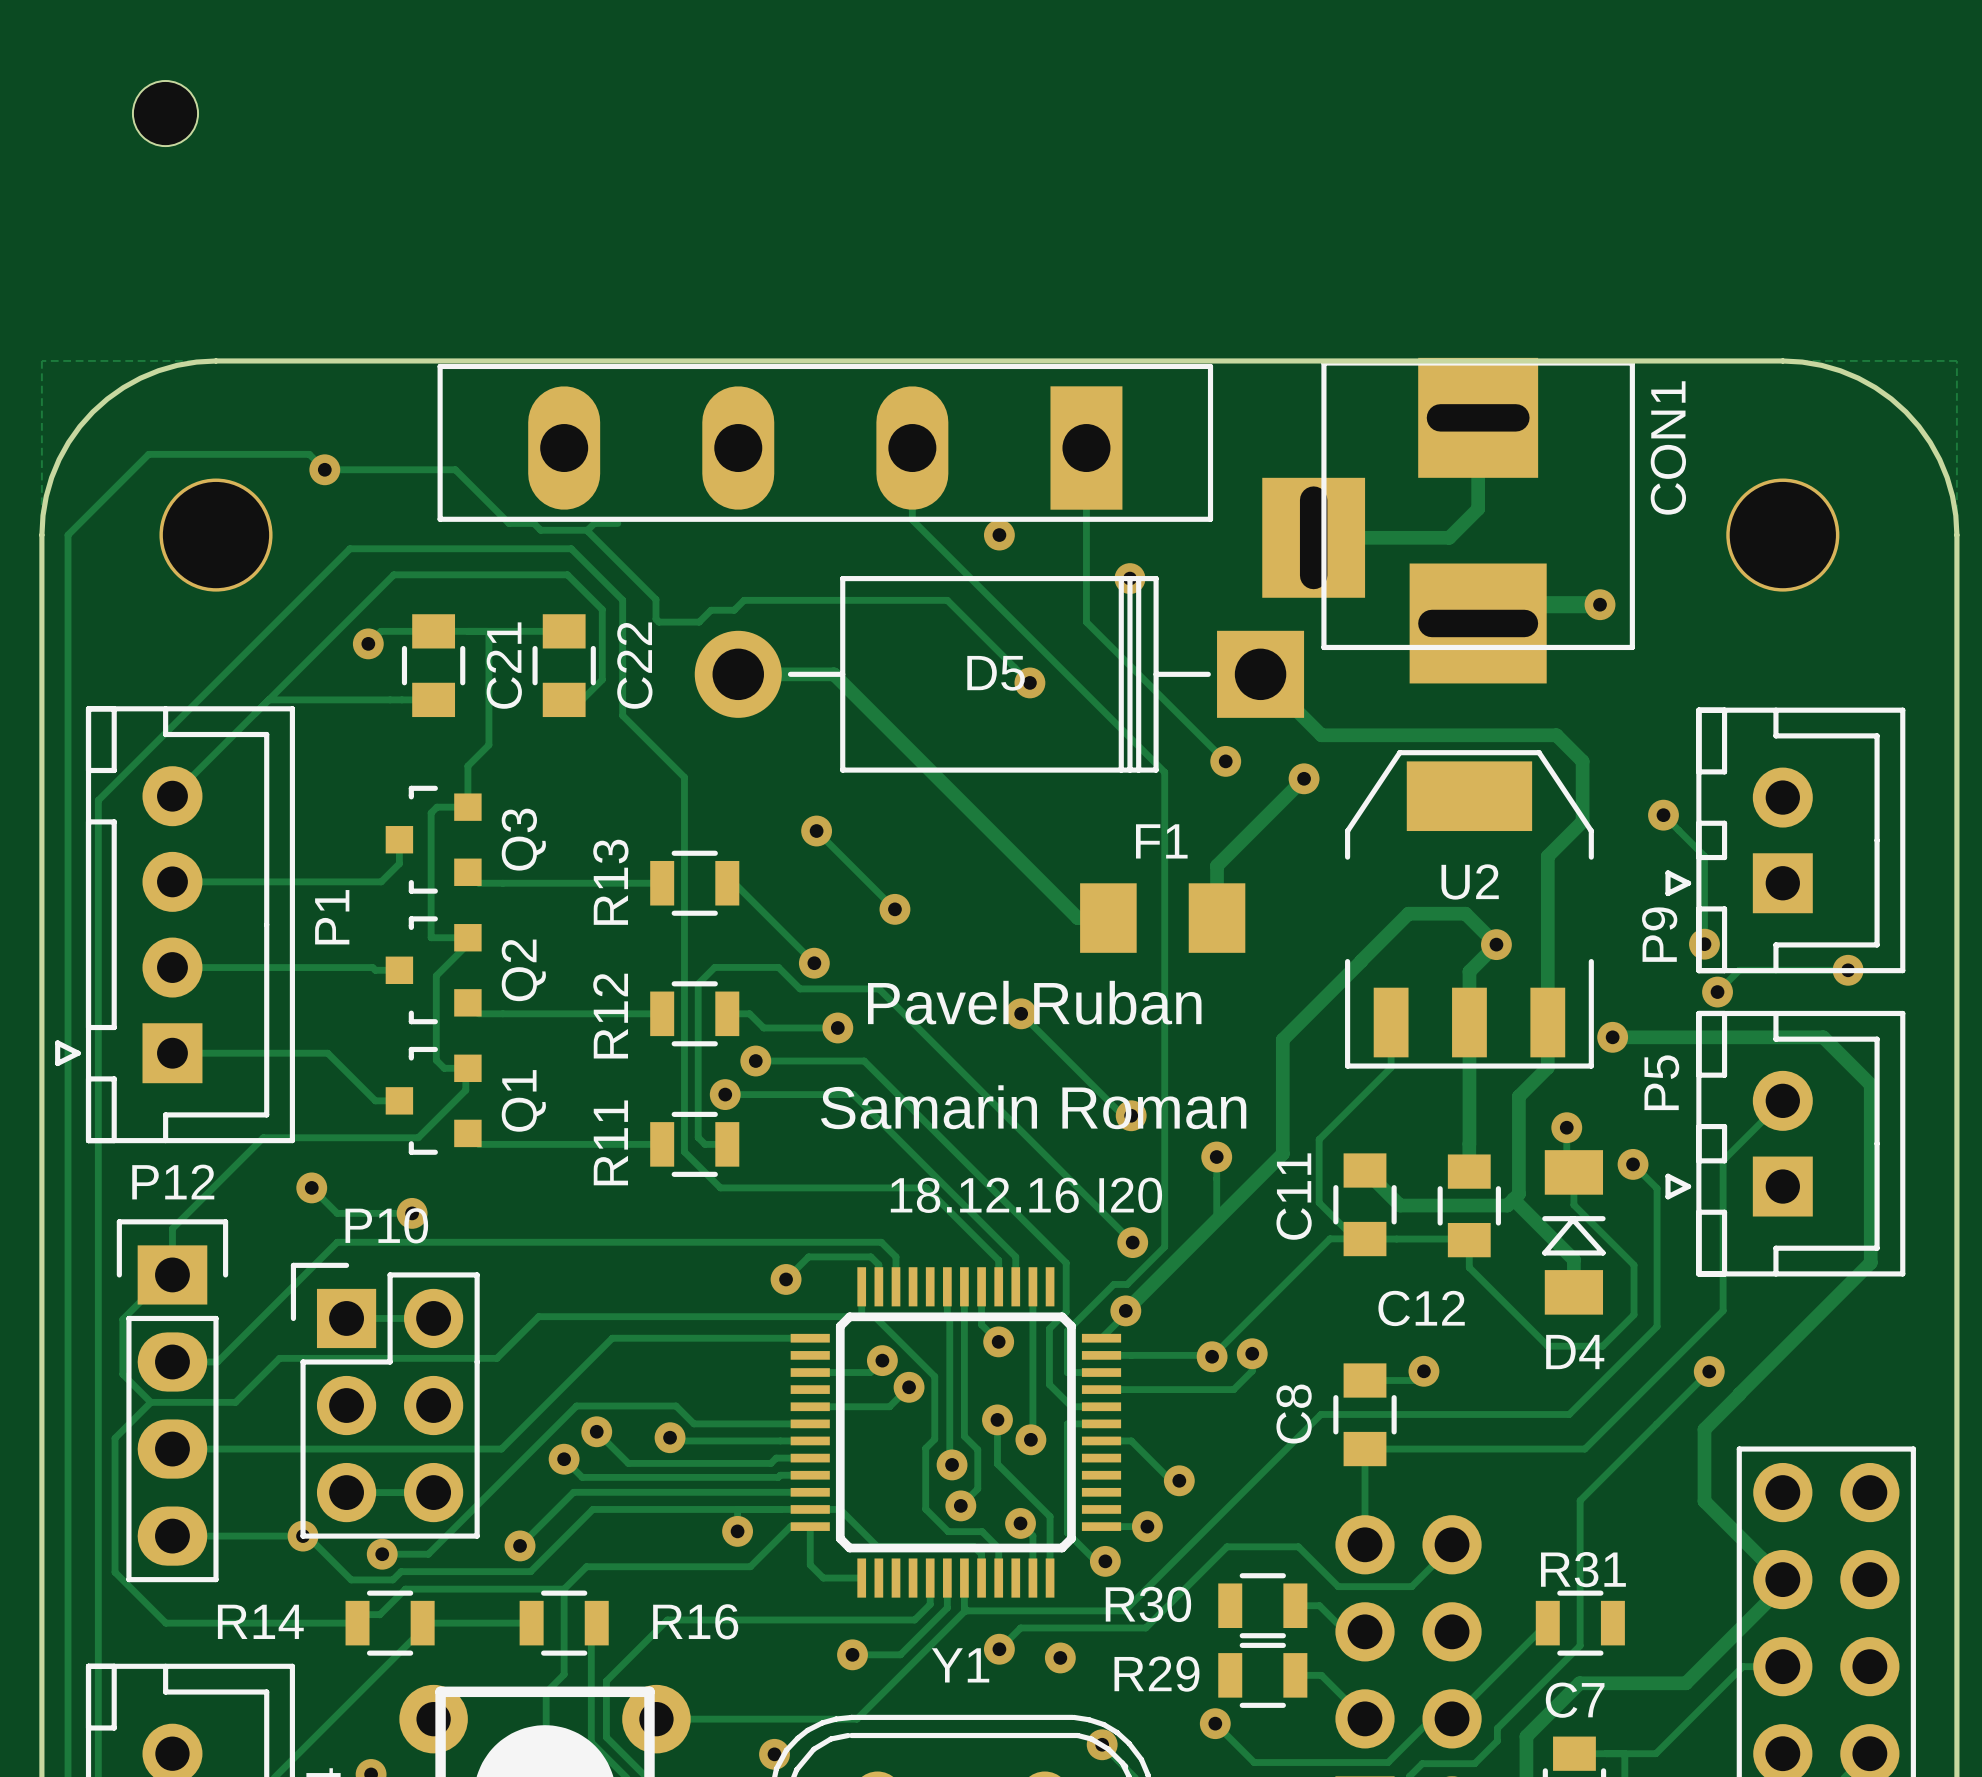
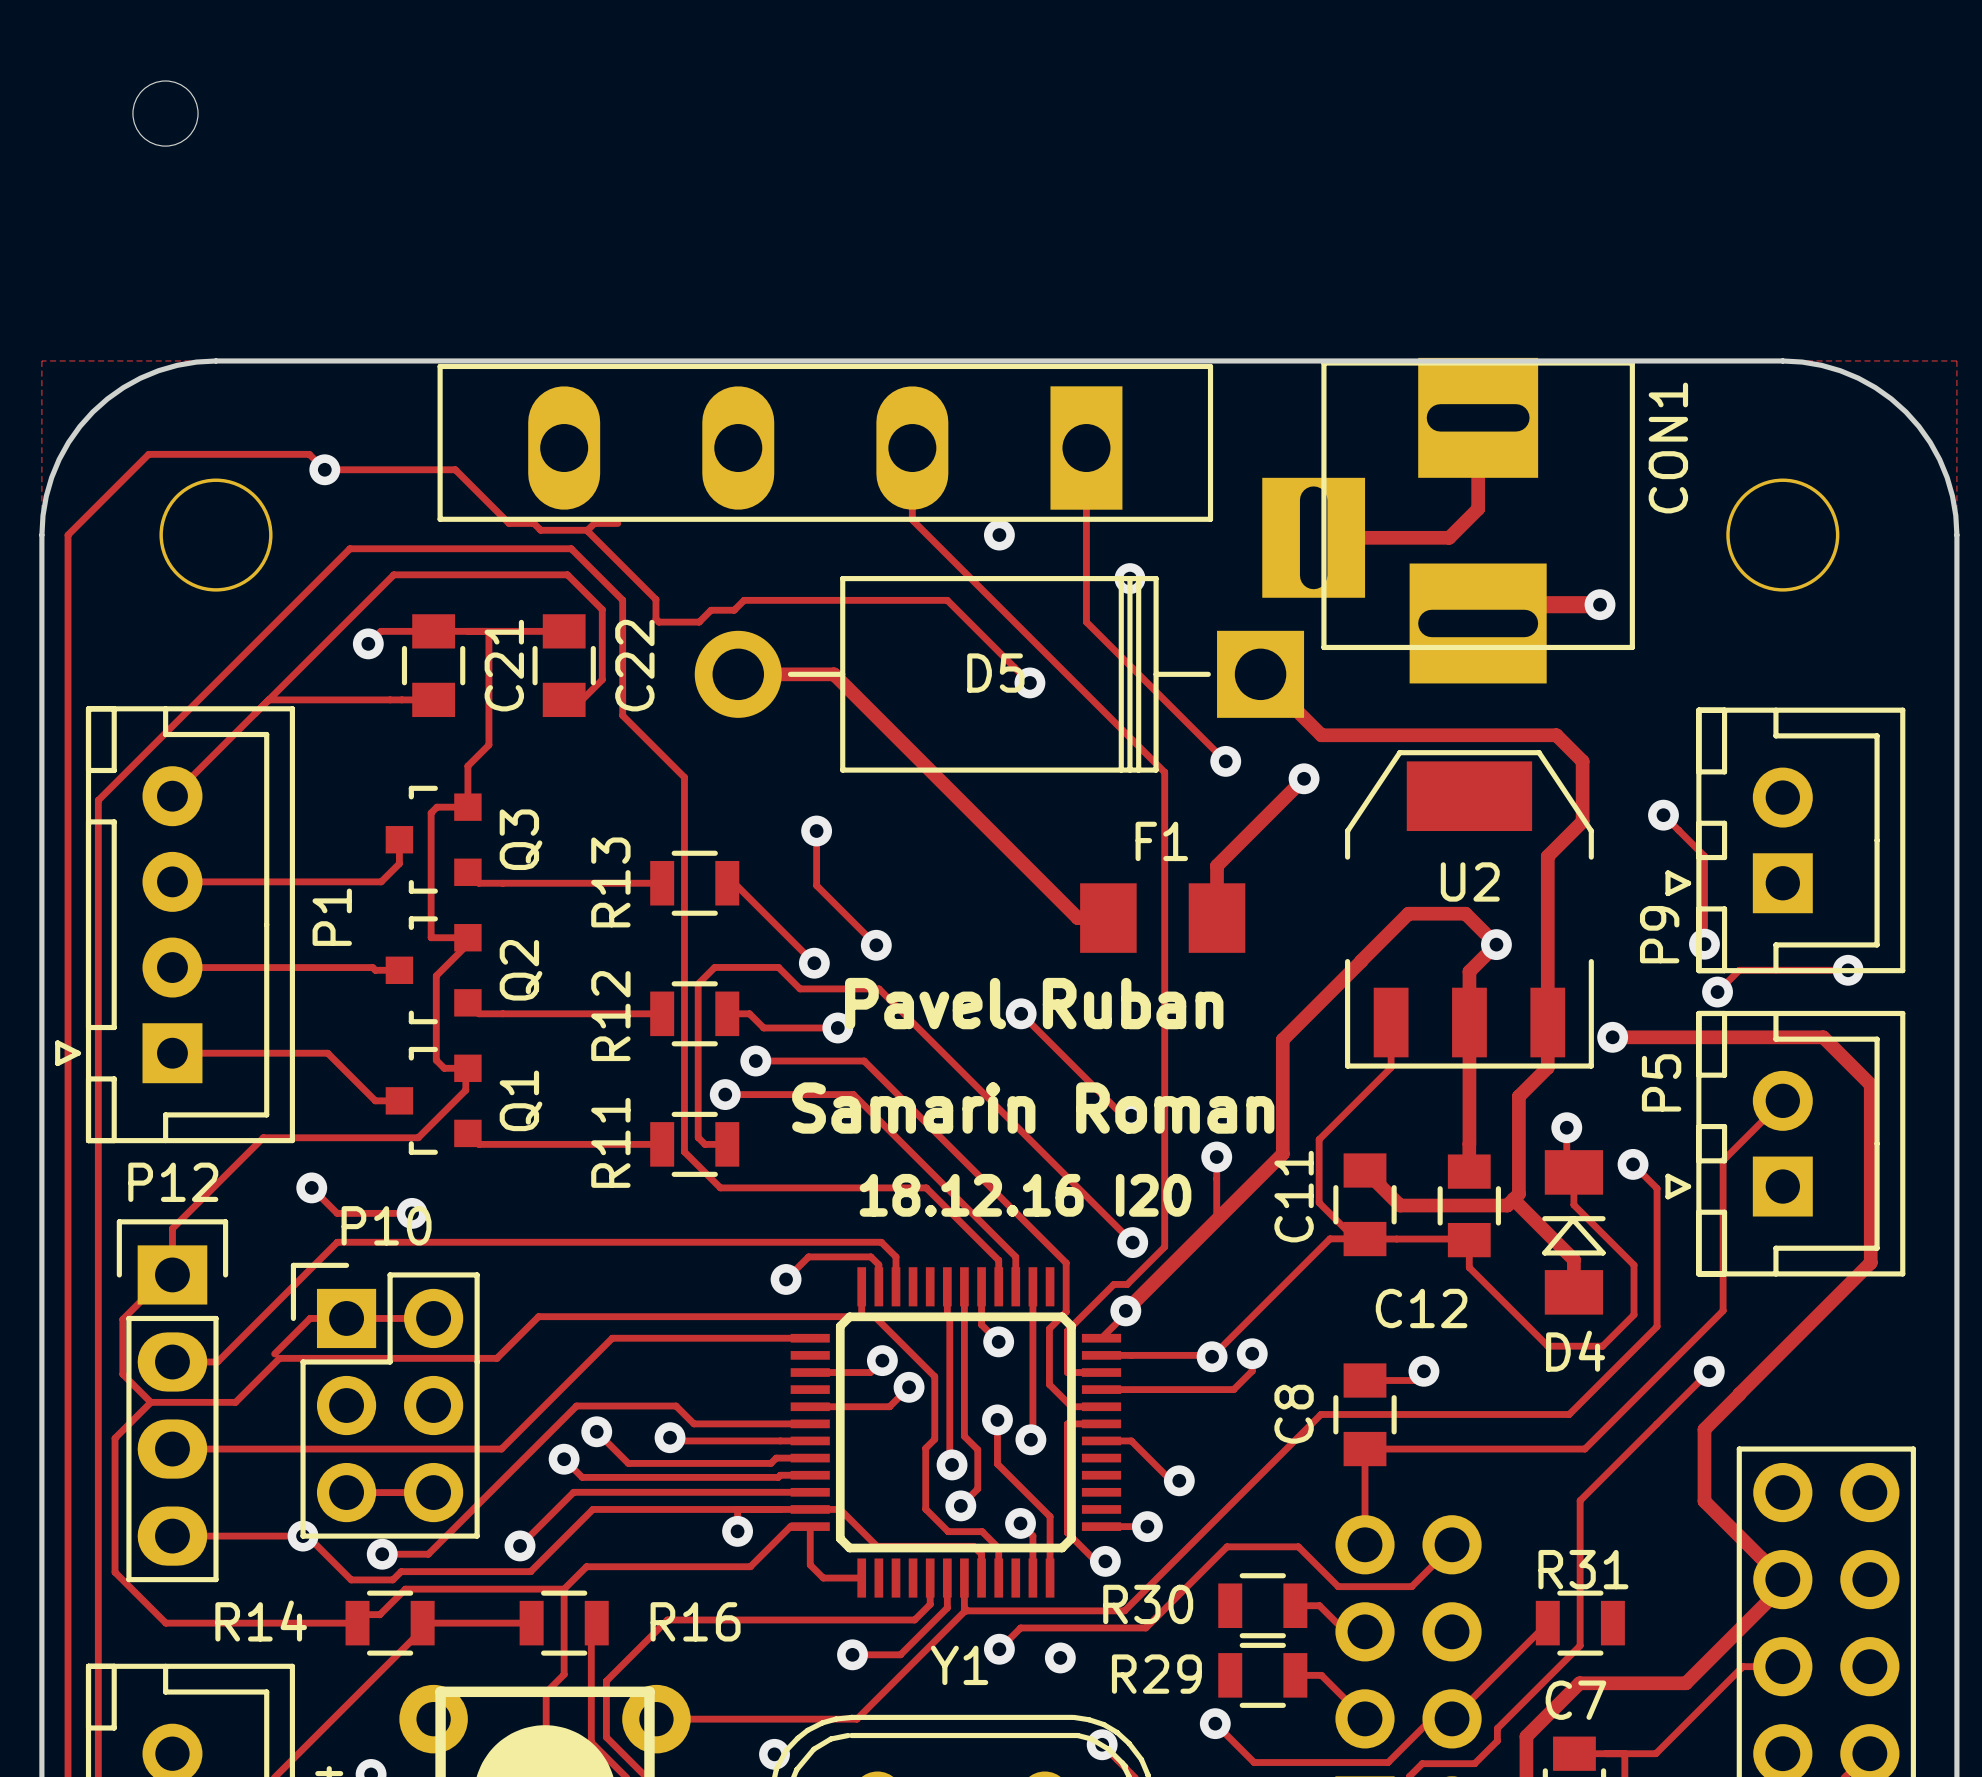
track: (816, 831) (894, 909) -> (816, 831) (816, 885) (876, 945)
via position: (894, 909) -> (876, 945)
track: none -> (346, 1318) (310, 1318) (274, 1353)

